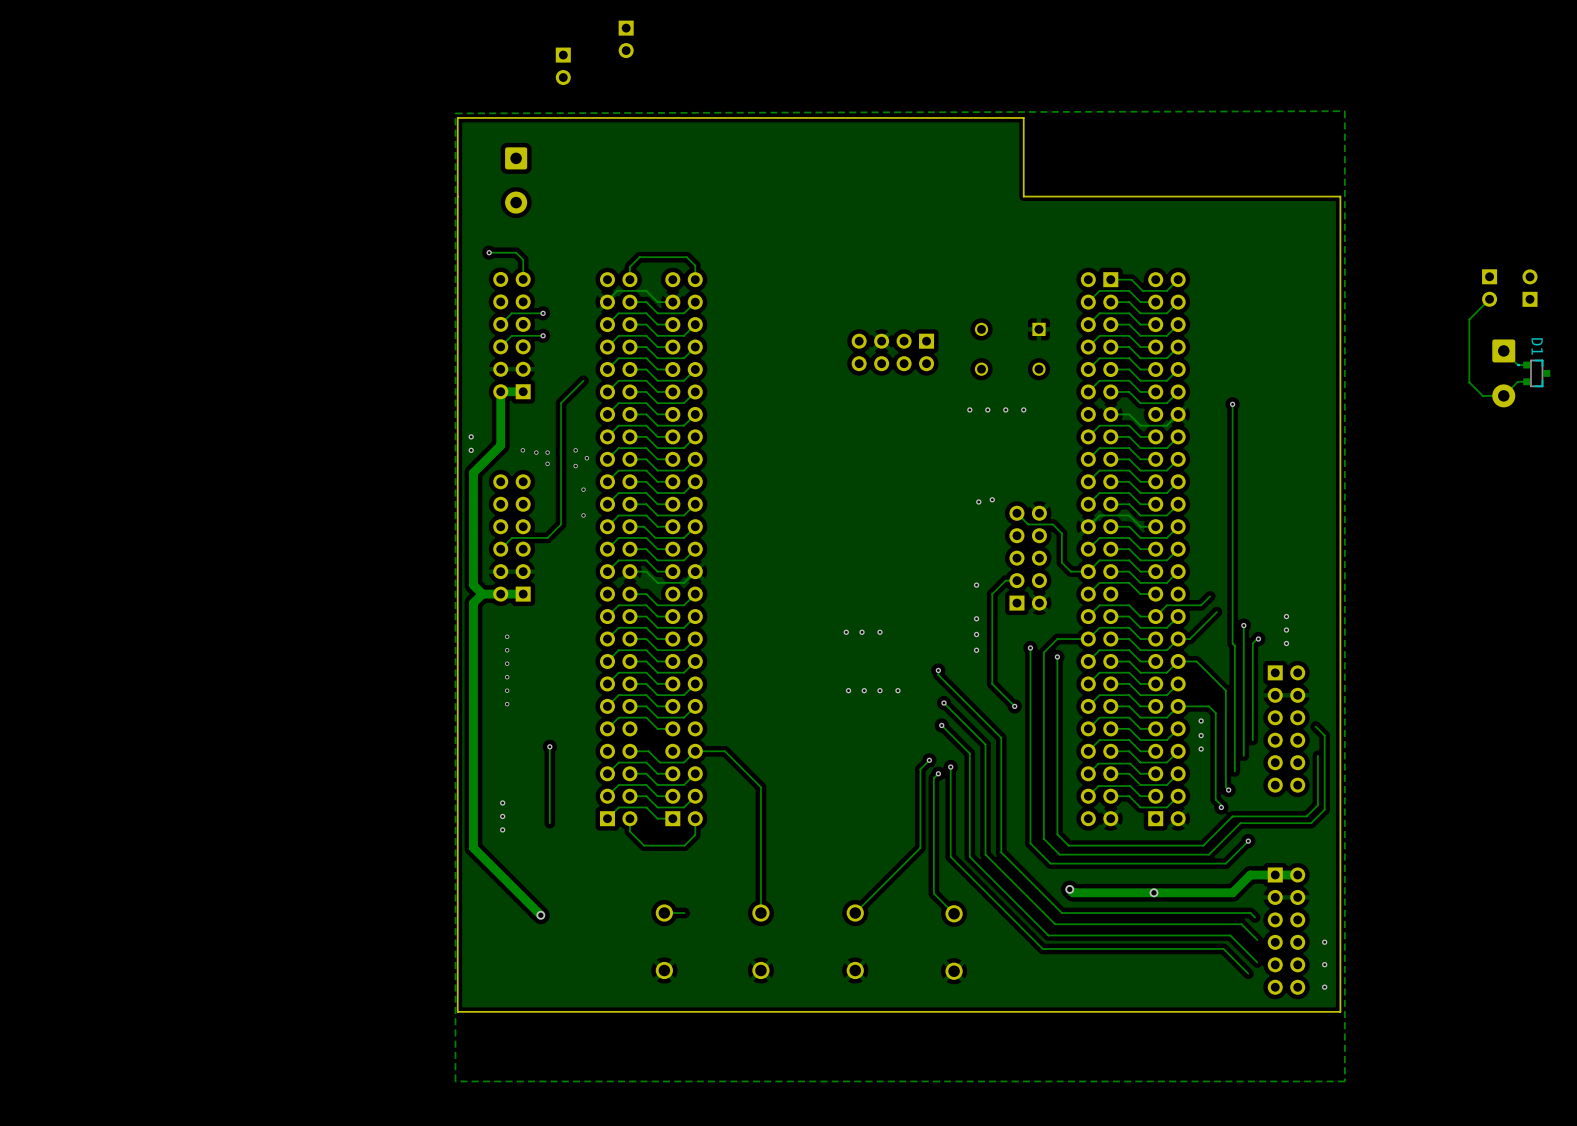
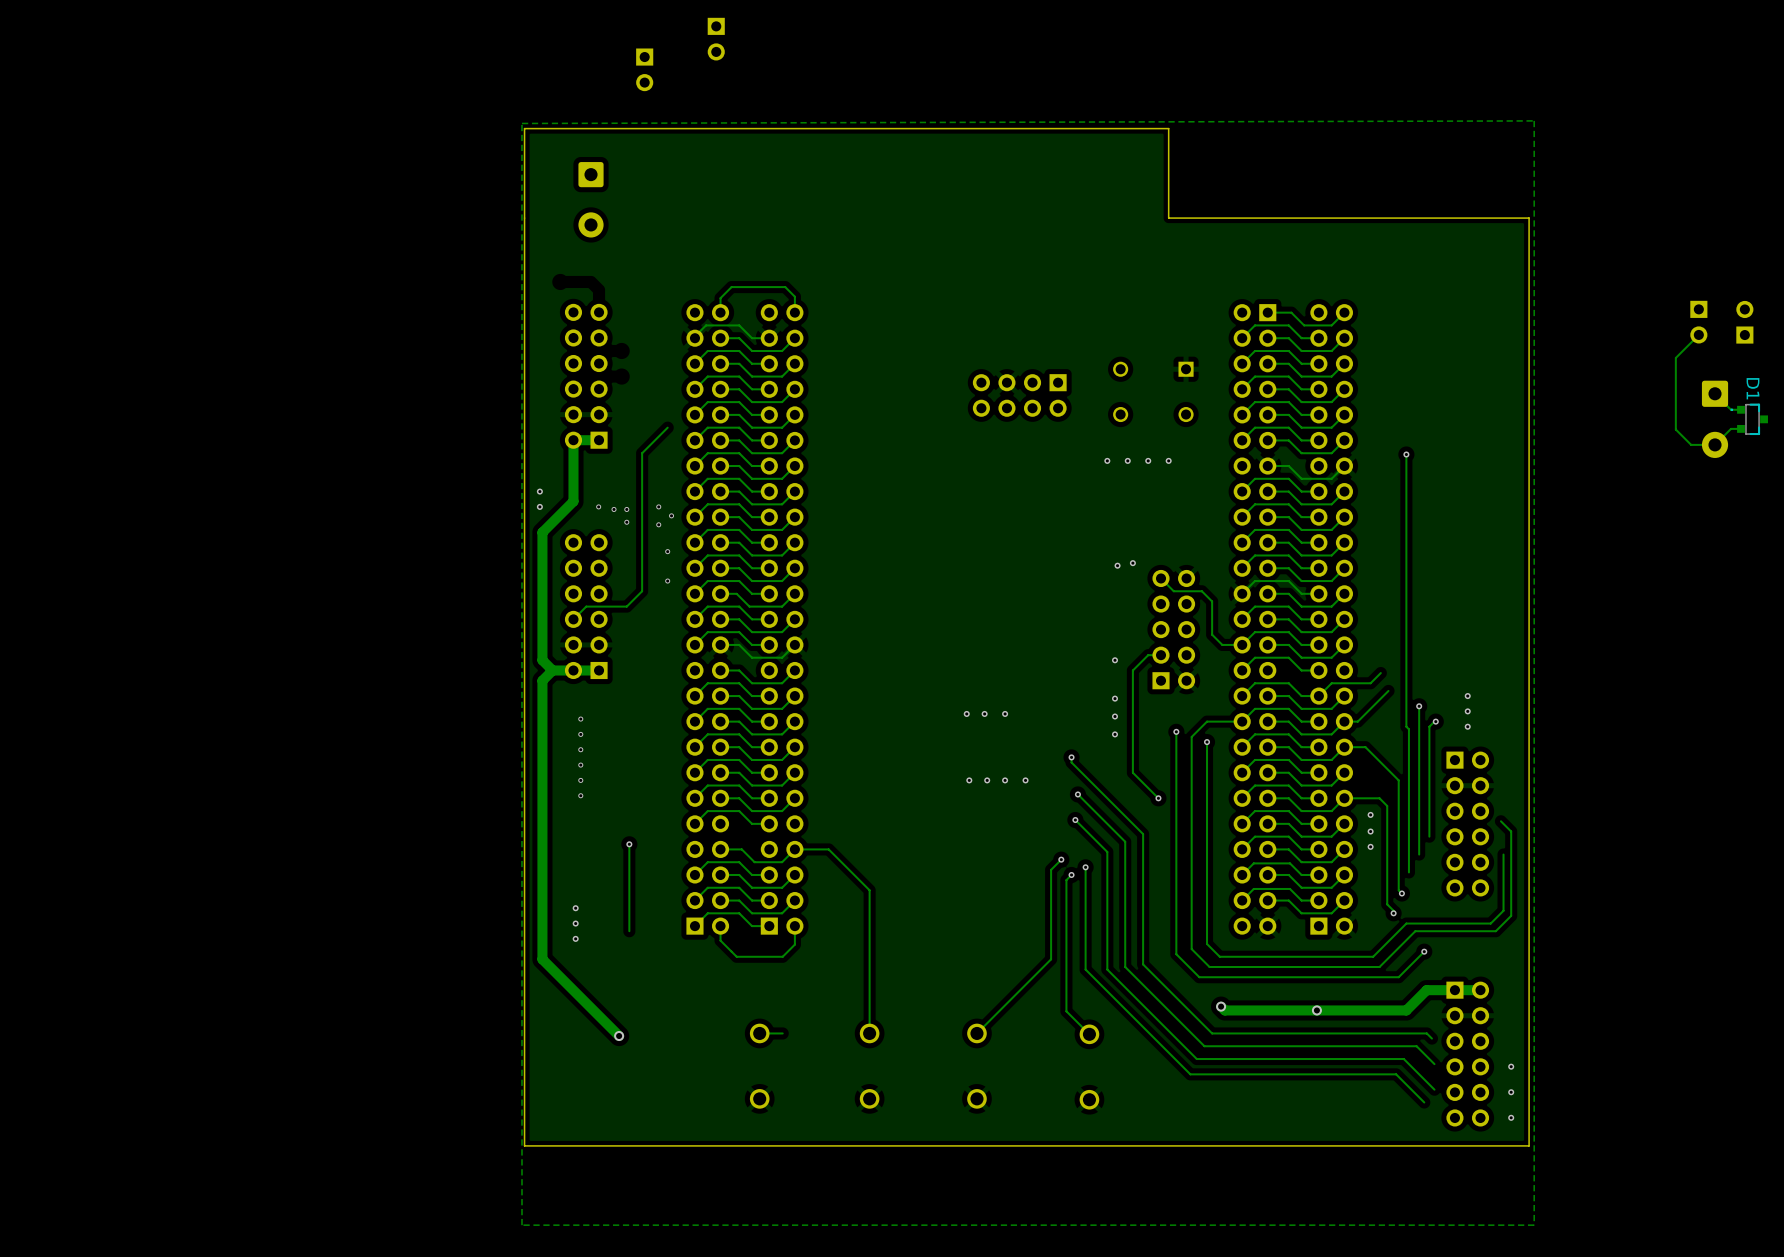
track: (489, 252) (516, 252) (523, 259) (523, 279) -> none
via: (489, 252) -> none
track: (543, 313) (511, 313) (500, 324) -> none
via: (543, 313) -> none
track: (543, 335) (511, 335) (500, 346) -> none
via: (543, 335) -> none

